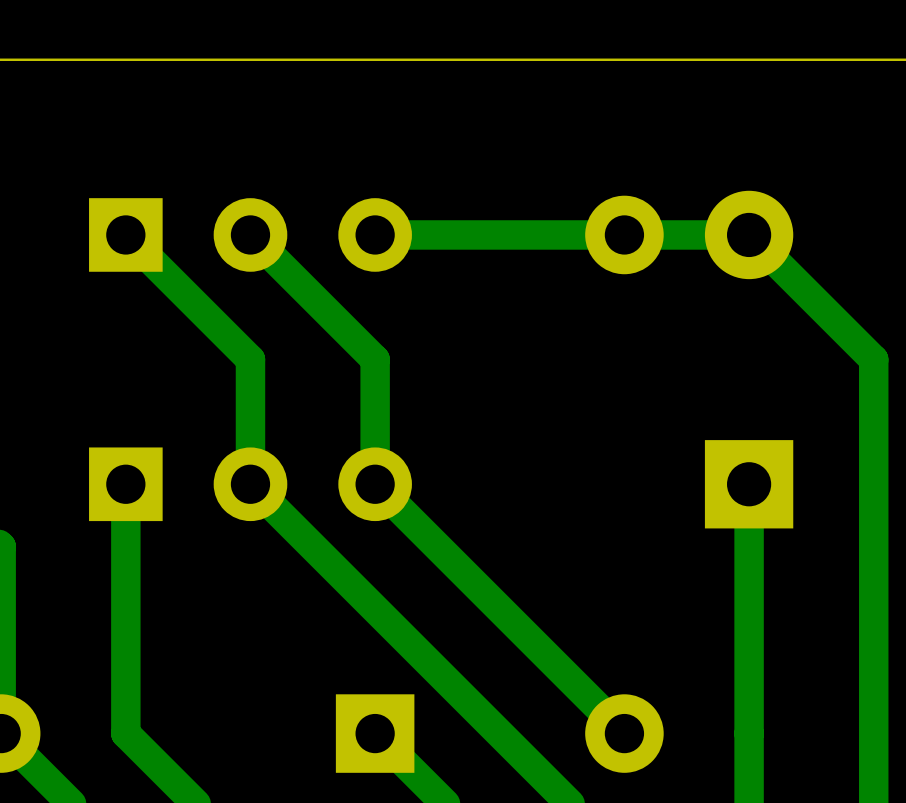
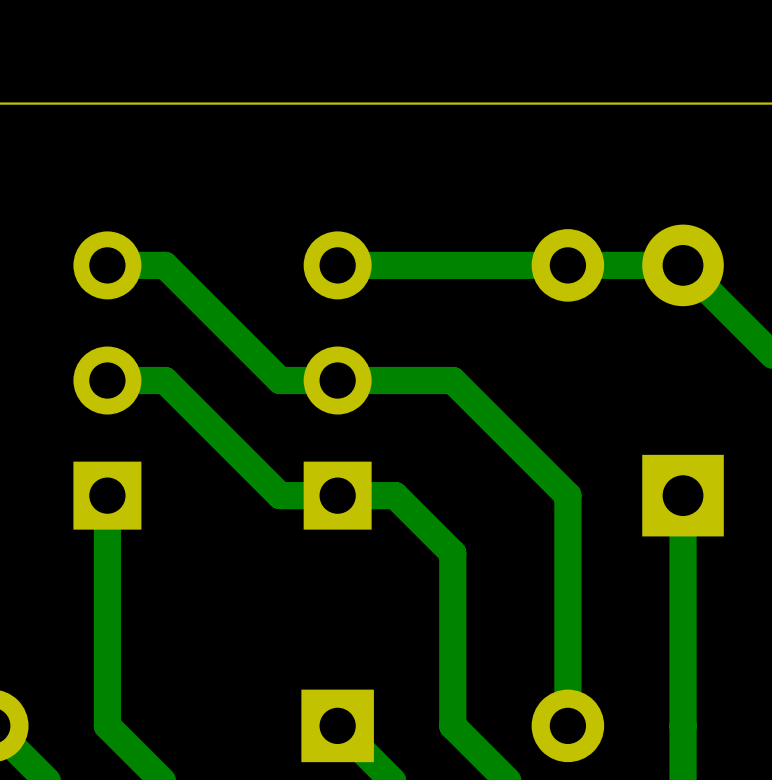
track: (125, 234) (250, 359) (250, 484) (499, 733) -> (107, 380) (164, 380) (280, 495) (395, 495) (452, 553) (452, 725)
track: (250, 234) (375, 359) (375, 484) (624, 733) -> (107, 265) (164, 265) (280, 380) (452, 380) (567, 495) (567, 725)
part: (250, 234) -> none
part: none -> (107, 380)
part: none -> (337, 380)
part: (250, 484) -> none

